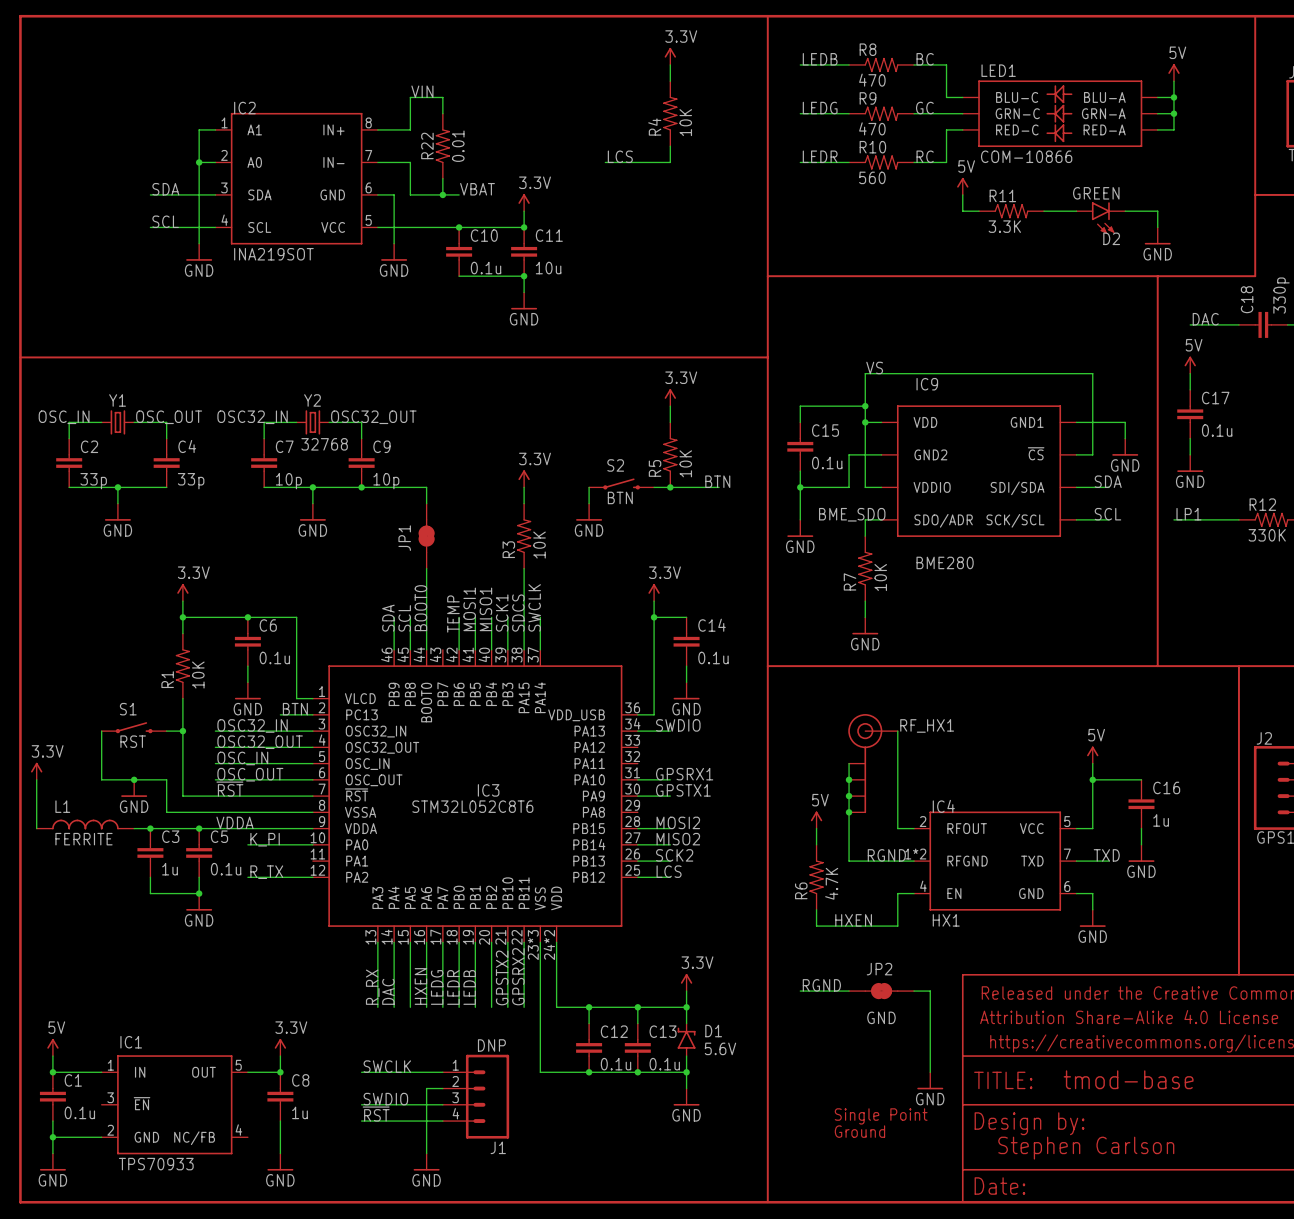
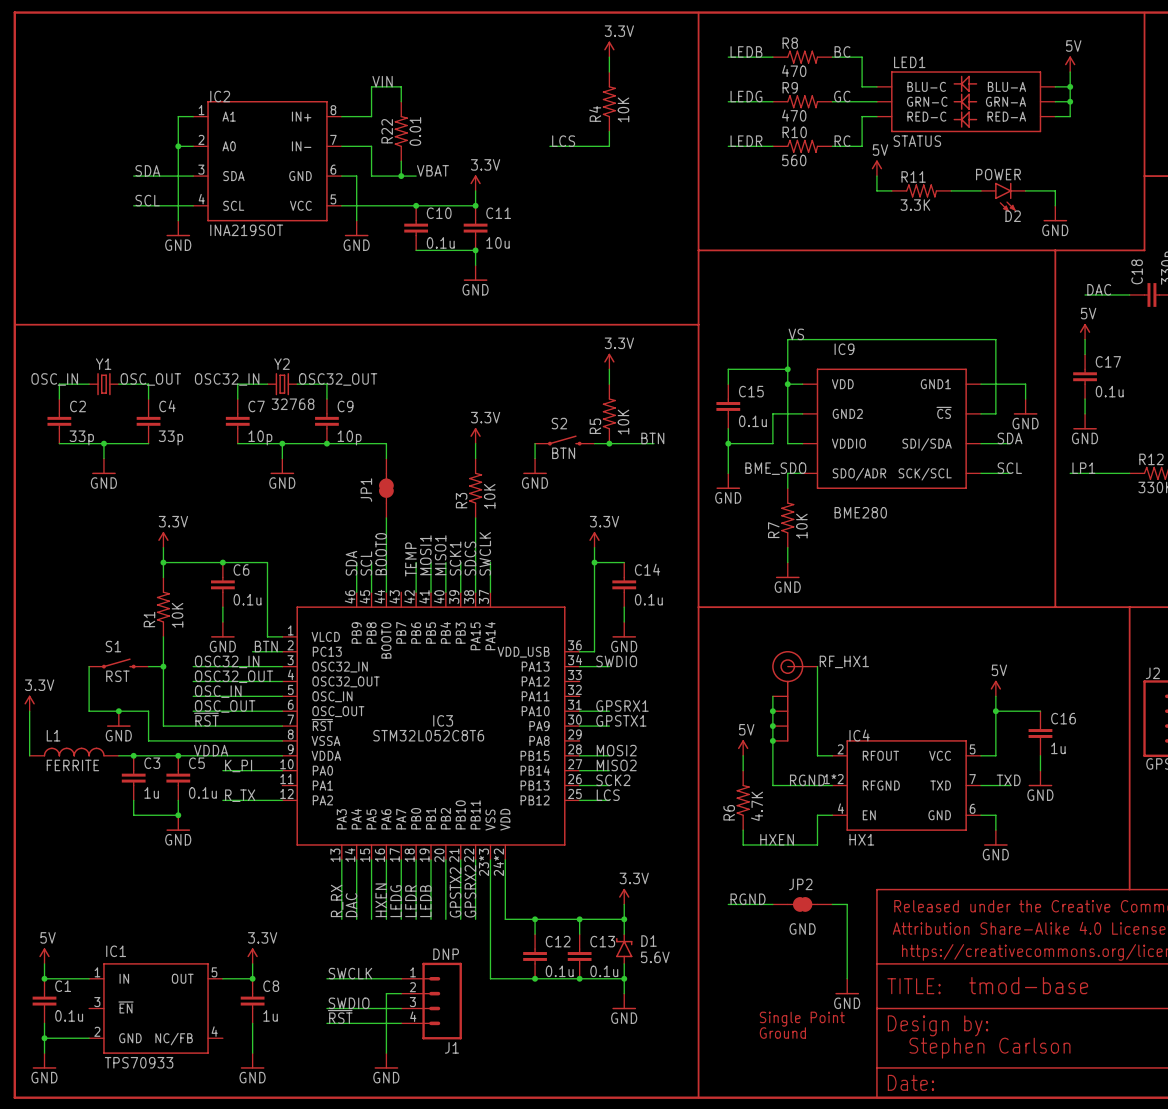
LED1 value: COM-10866 (1026, 156) -> STATUS (917, 141)
D2 value: GREEN (1096, 193) -> POWER (998, 174)

